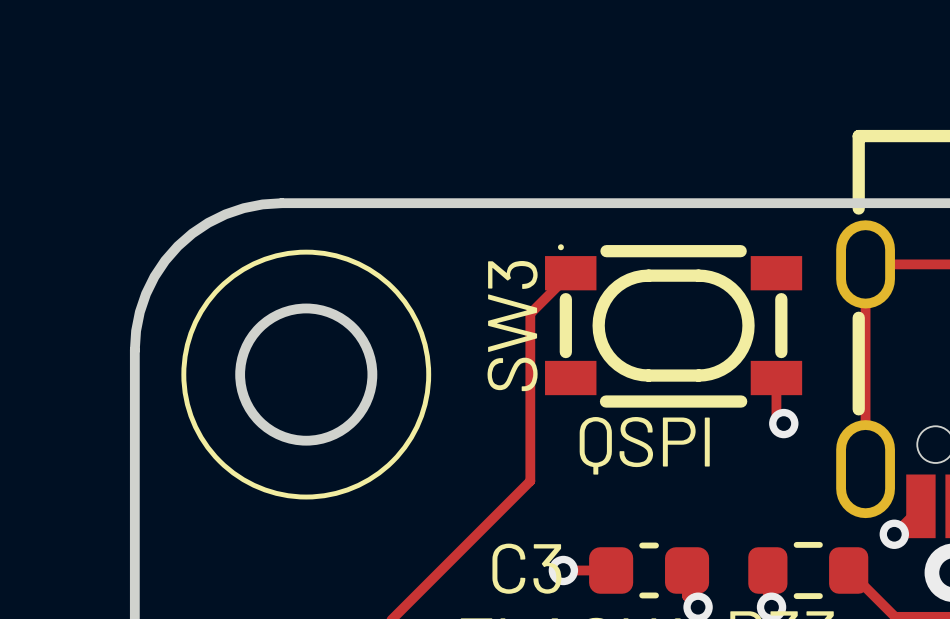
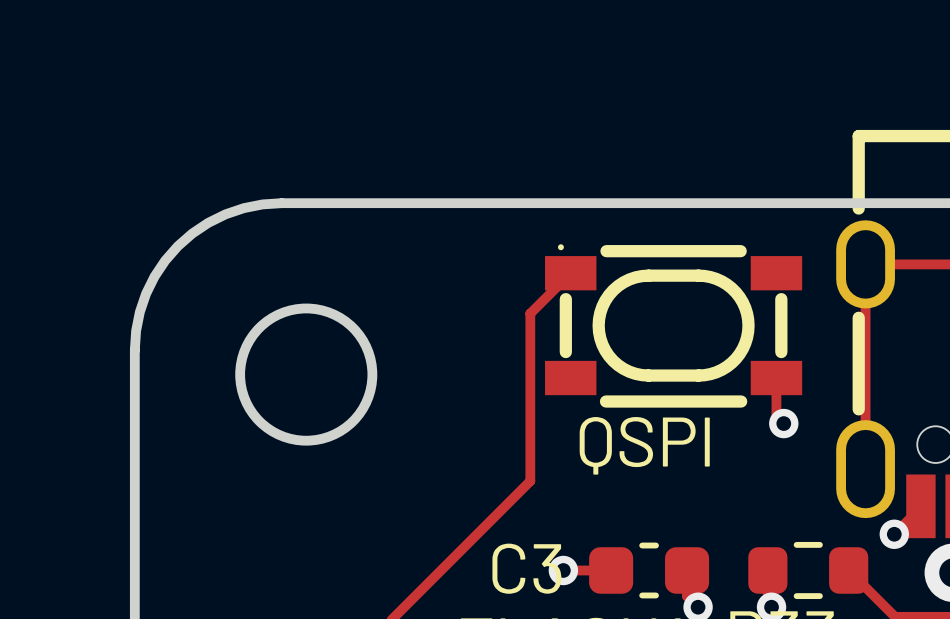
drawing: [181, 249, 432, 500] -> none
SW3 name: SW3 (512, 326) -> none

